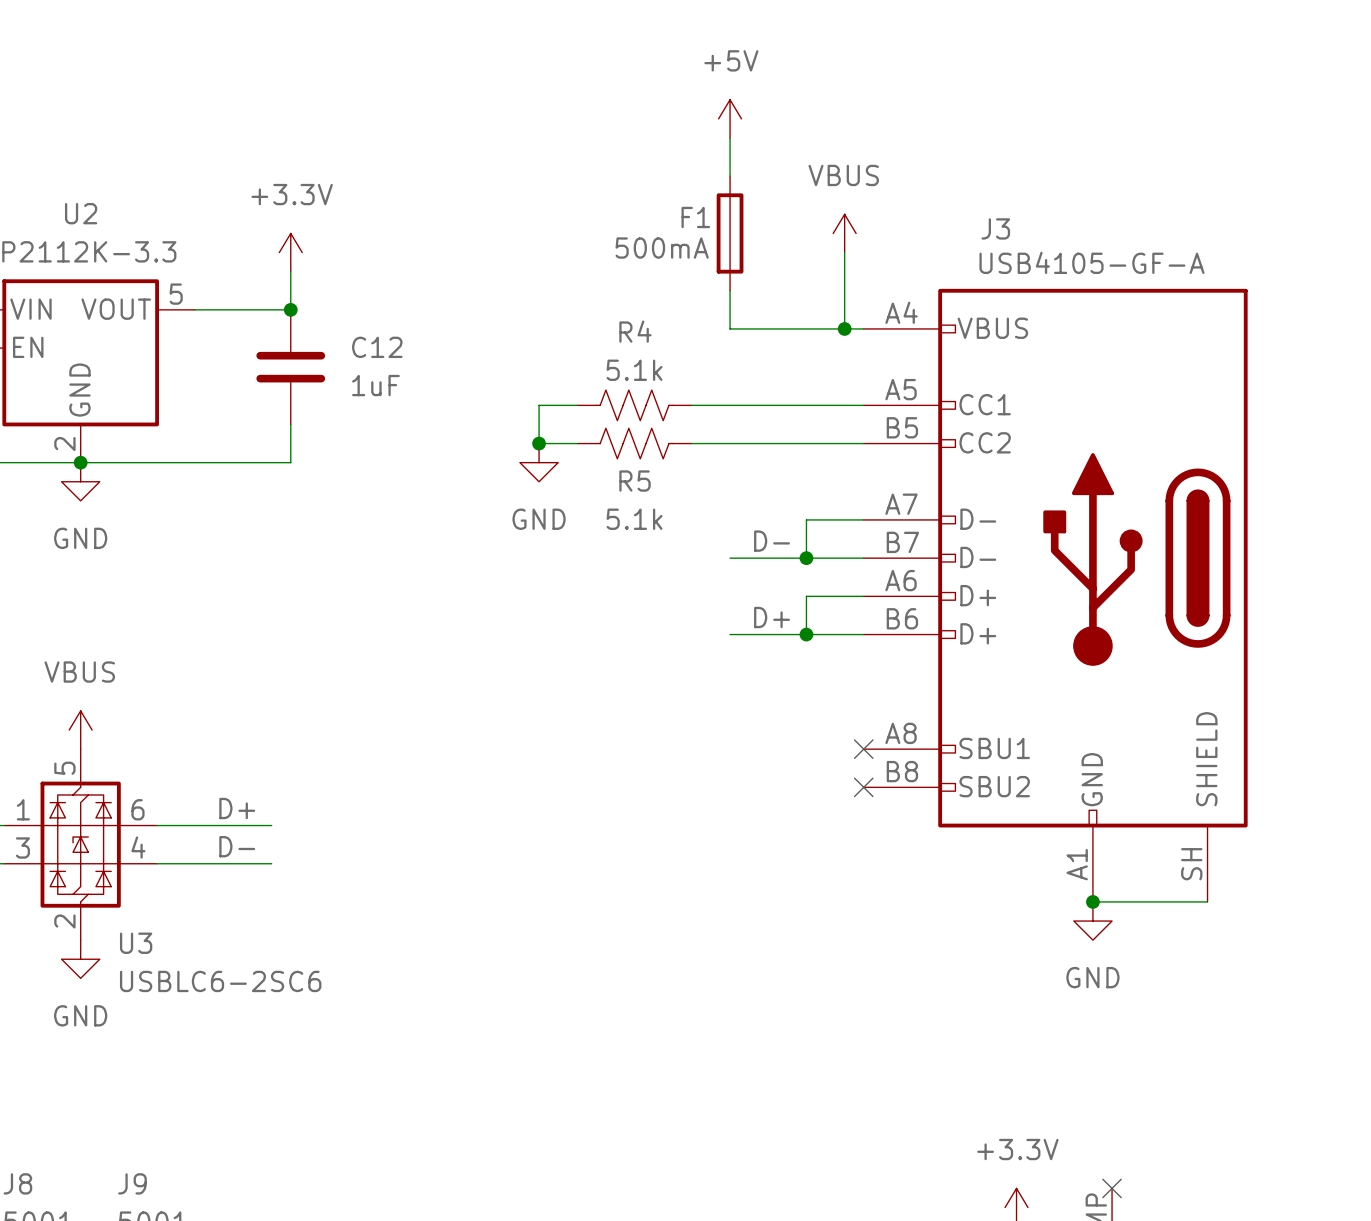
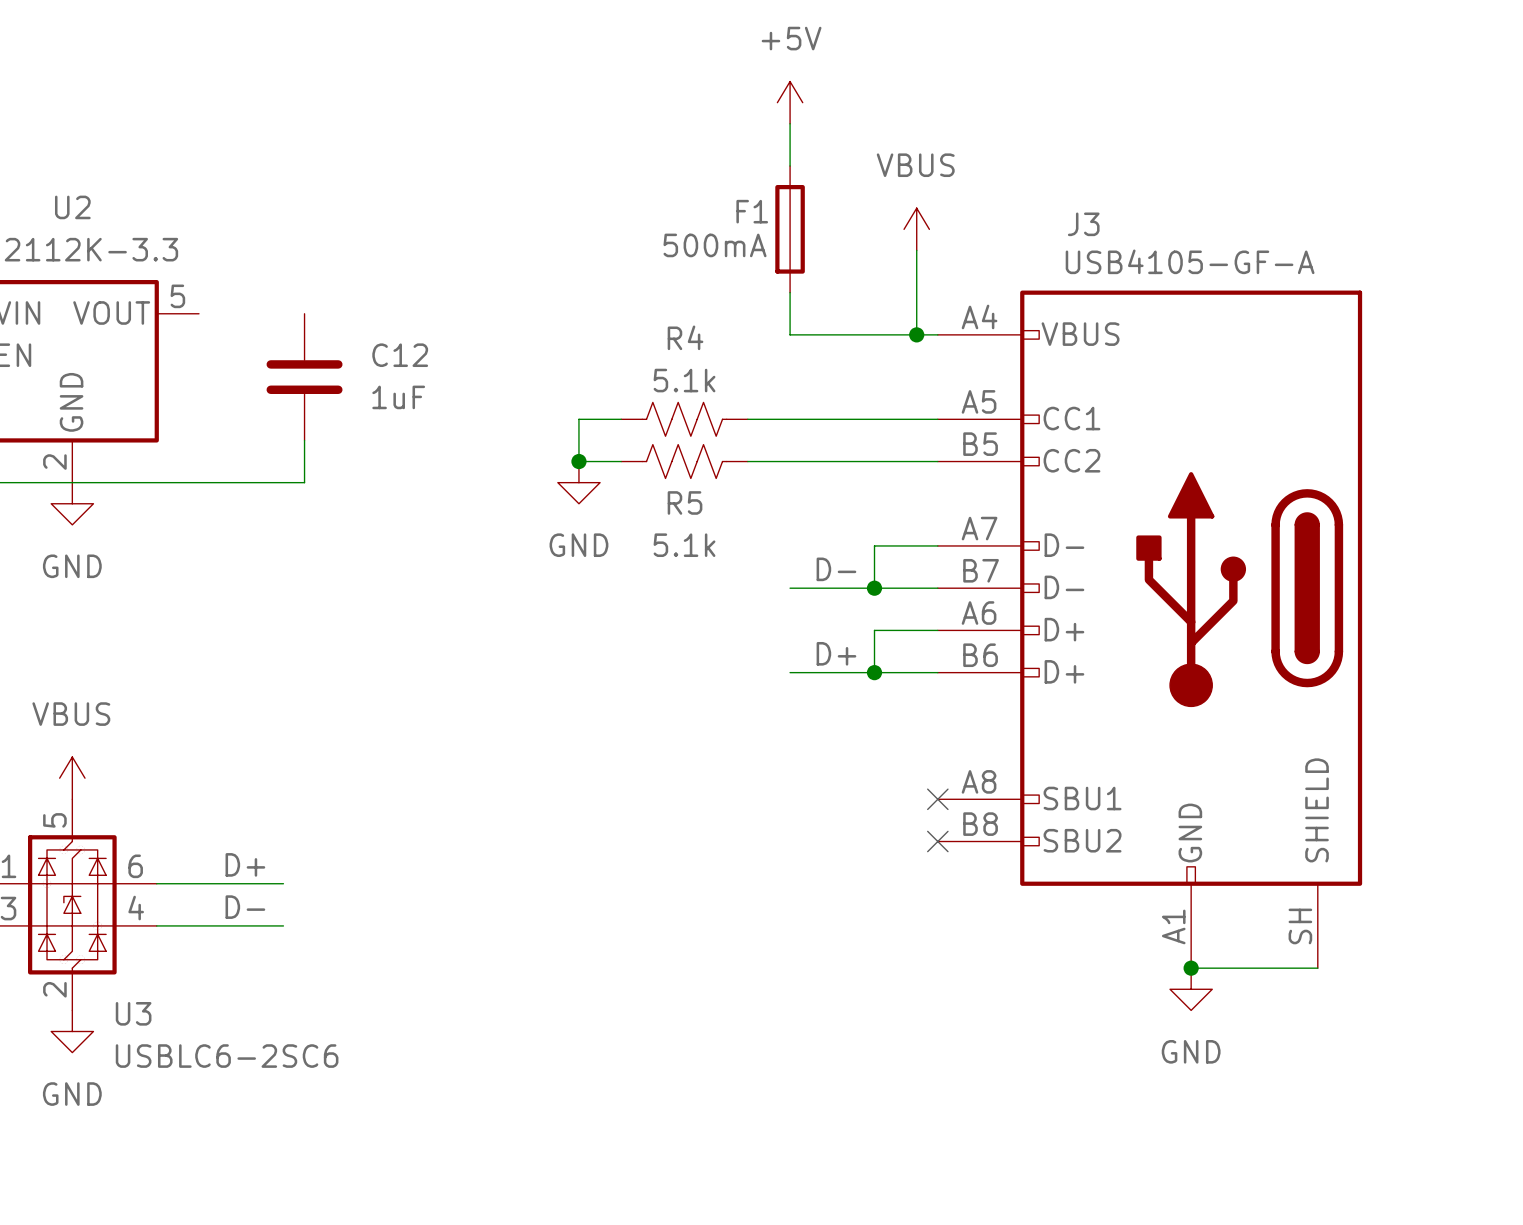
power symbol: +3.3V (290, 252) -> none
wire: (290, 271) (290, 309) (195, 309) -> none
junction: (290, 309) -> none
junction: (80, 462) -> none

